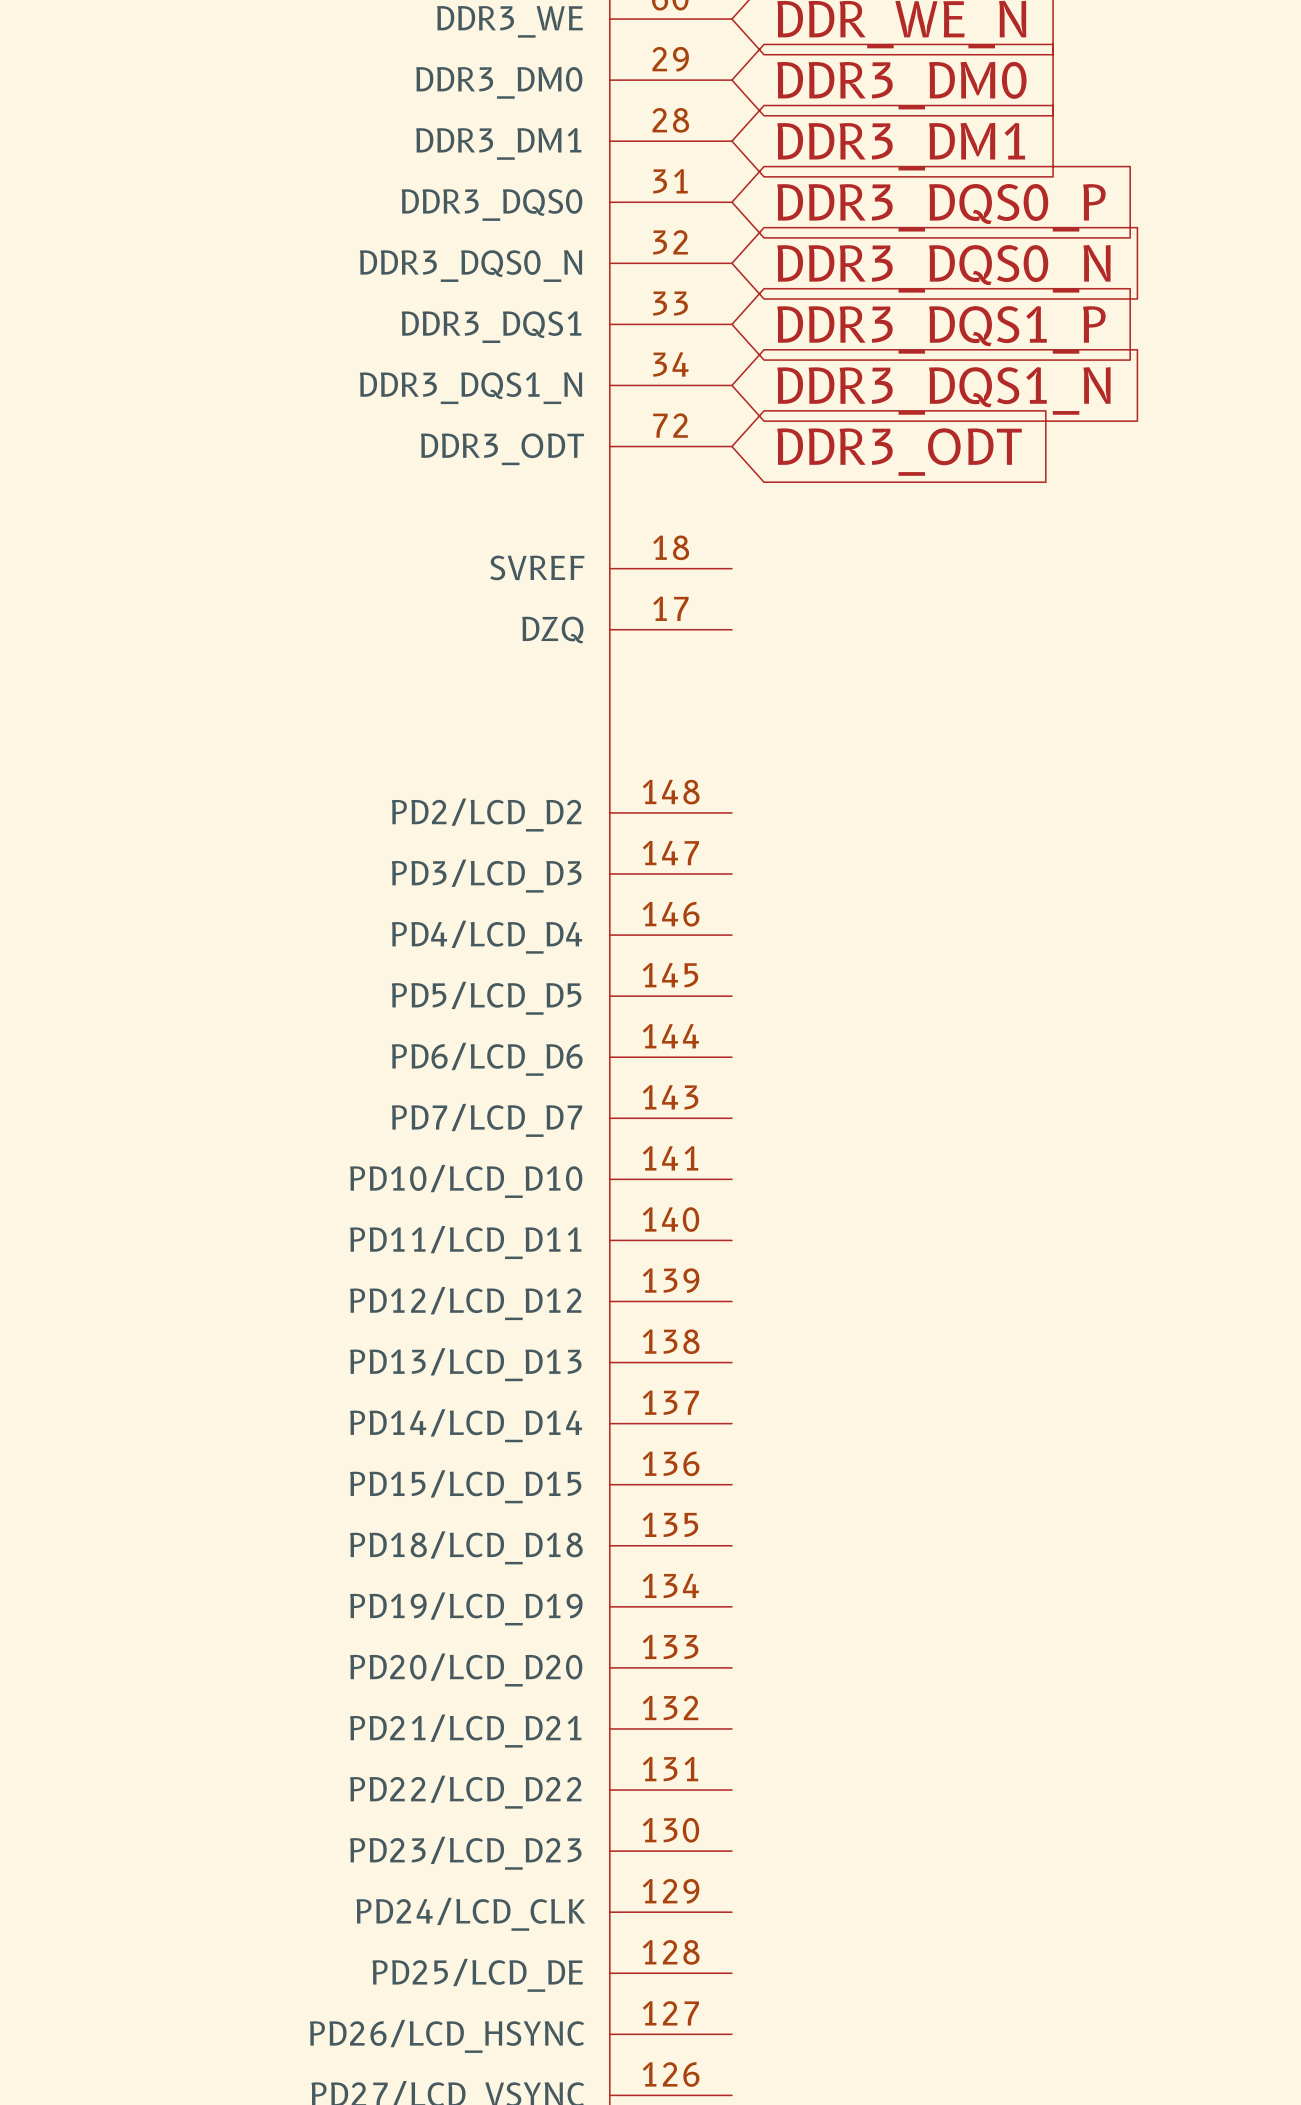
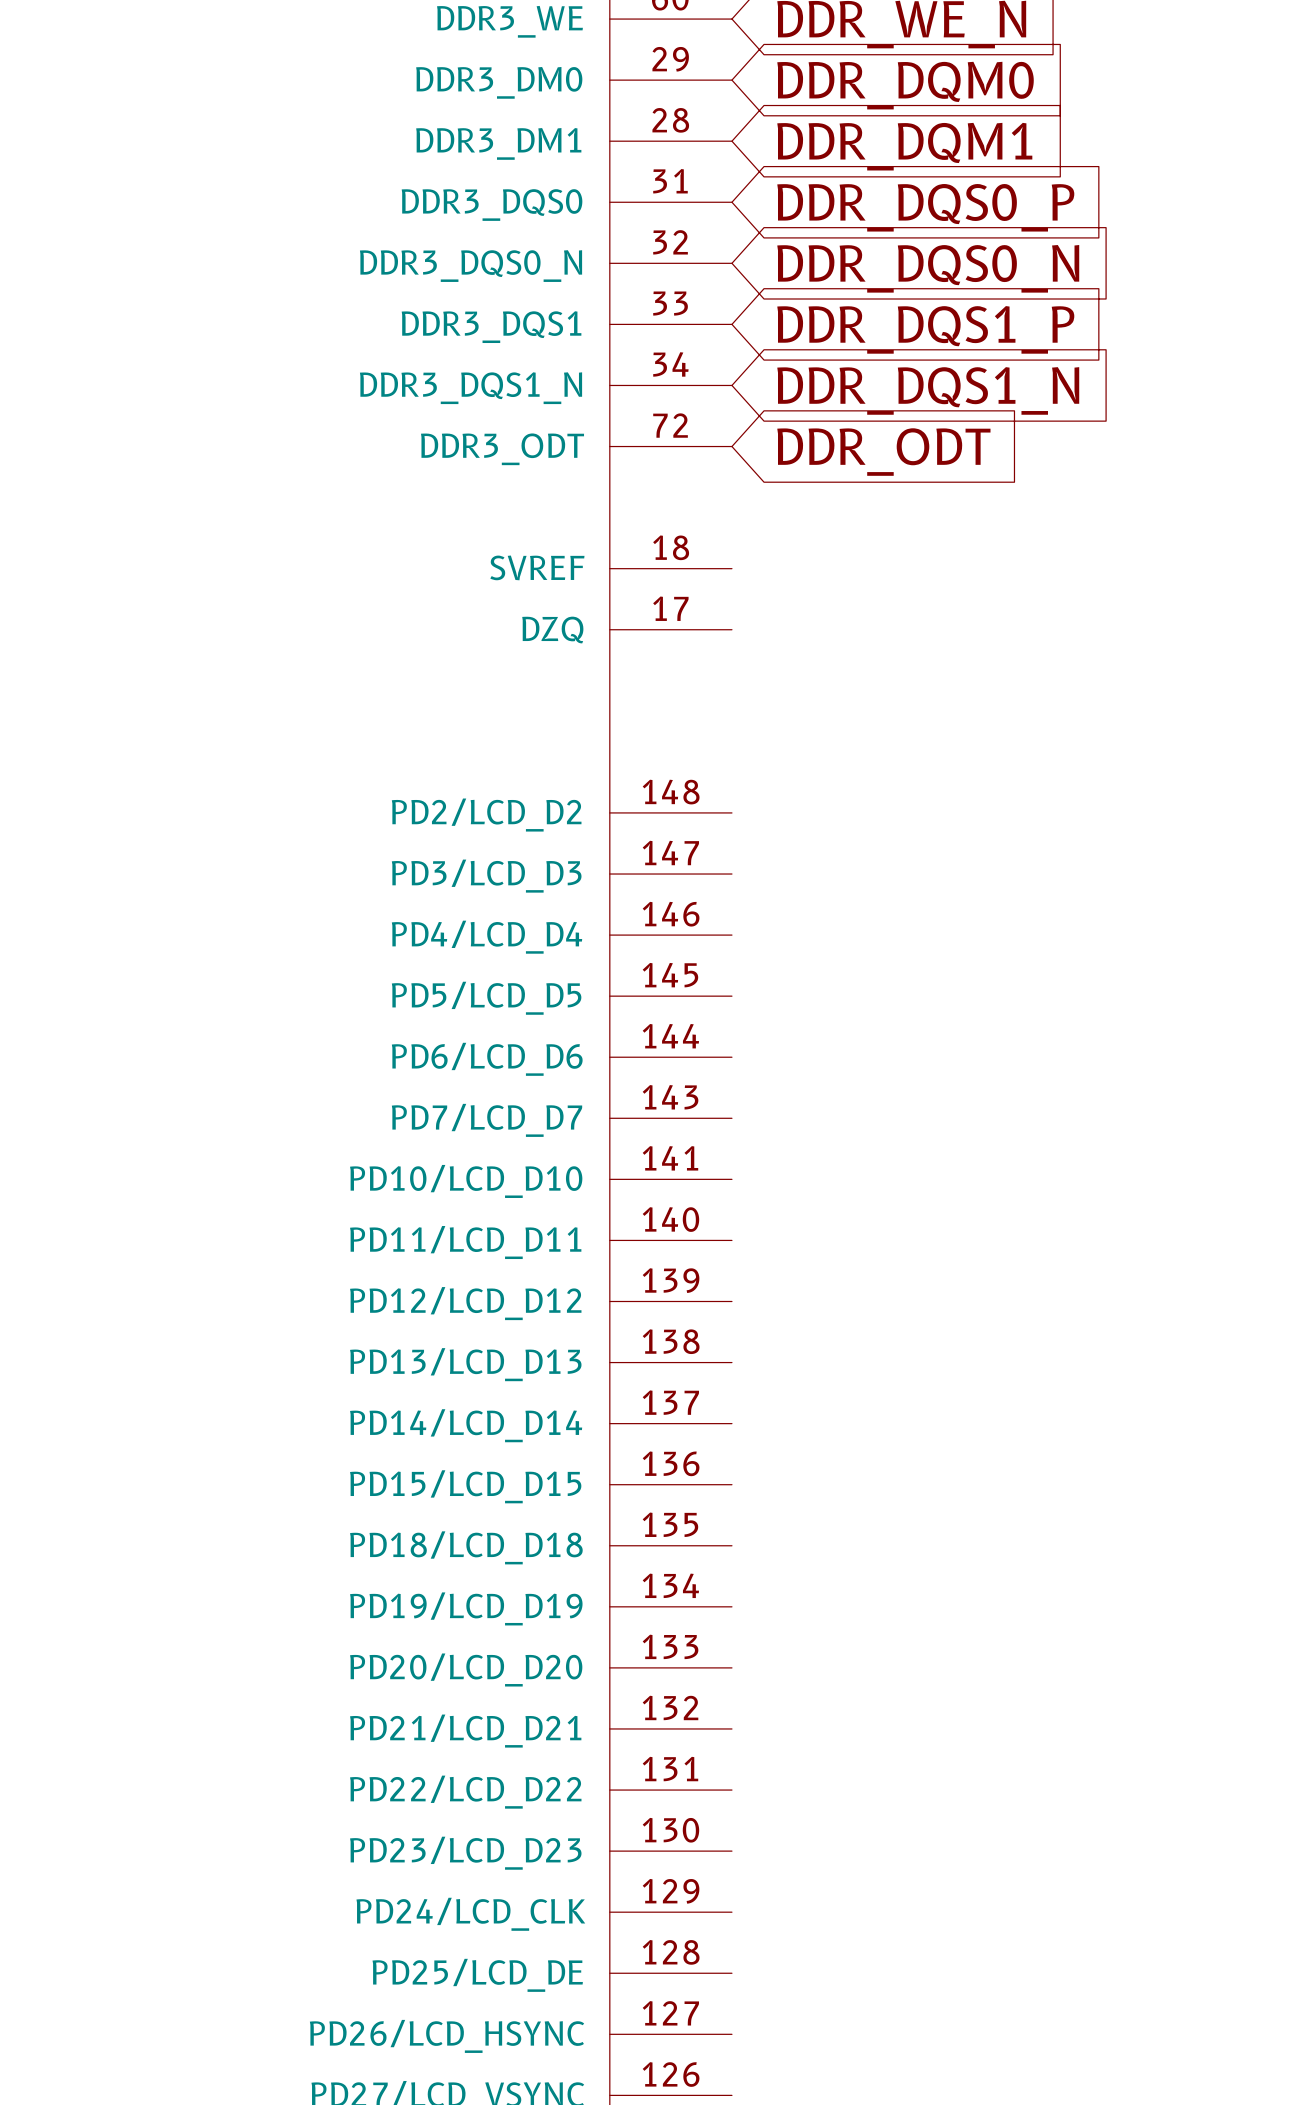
global label: DDR3_DM0 (901, 85) -> DDR_DQM0 (905, 85)
global label: DDR3_DM1 (901, 146) -> DDR_DQM1 (904, 146)
global label: DDR3_DQS0_P (941, 207) -> DDR_DQS0_P (925, 207)
global label: DDR3_DQS0_N (943, 268) -> DDR_DQS0_N (928, 268)
global label: DDR3_DQS1_P (941, 329) -> DDR_DQS1_P (925, 329)
global label: DDR3_DQS1_N (943, 390) -> DDR_DQS1_N (928, 390)
global label: DDR3_ODT (899, 452) -> DDR_ODT (883, 452)

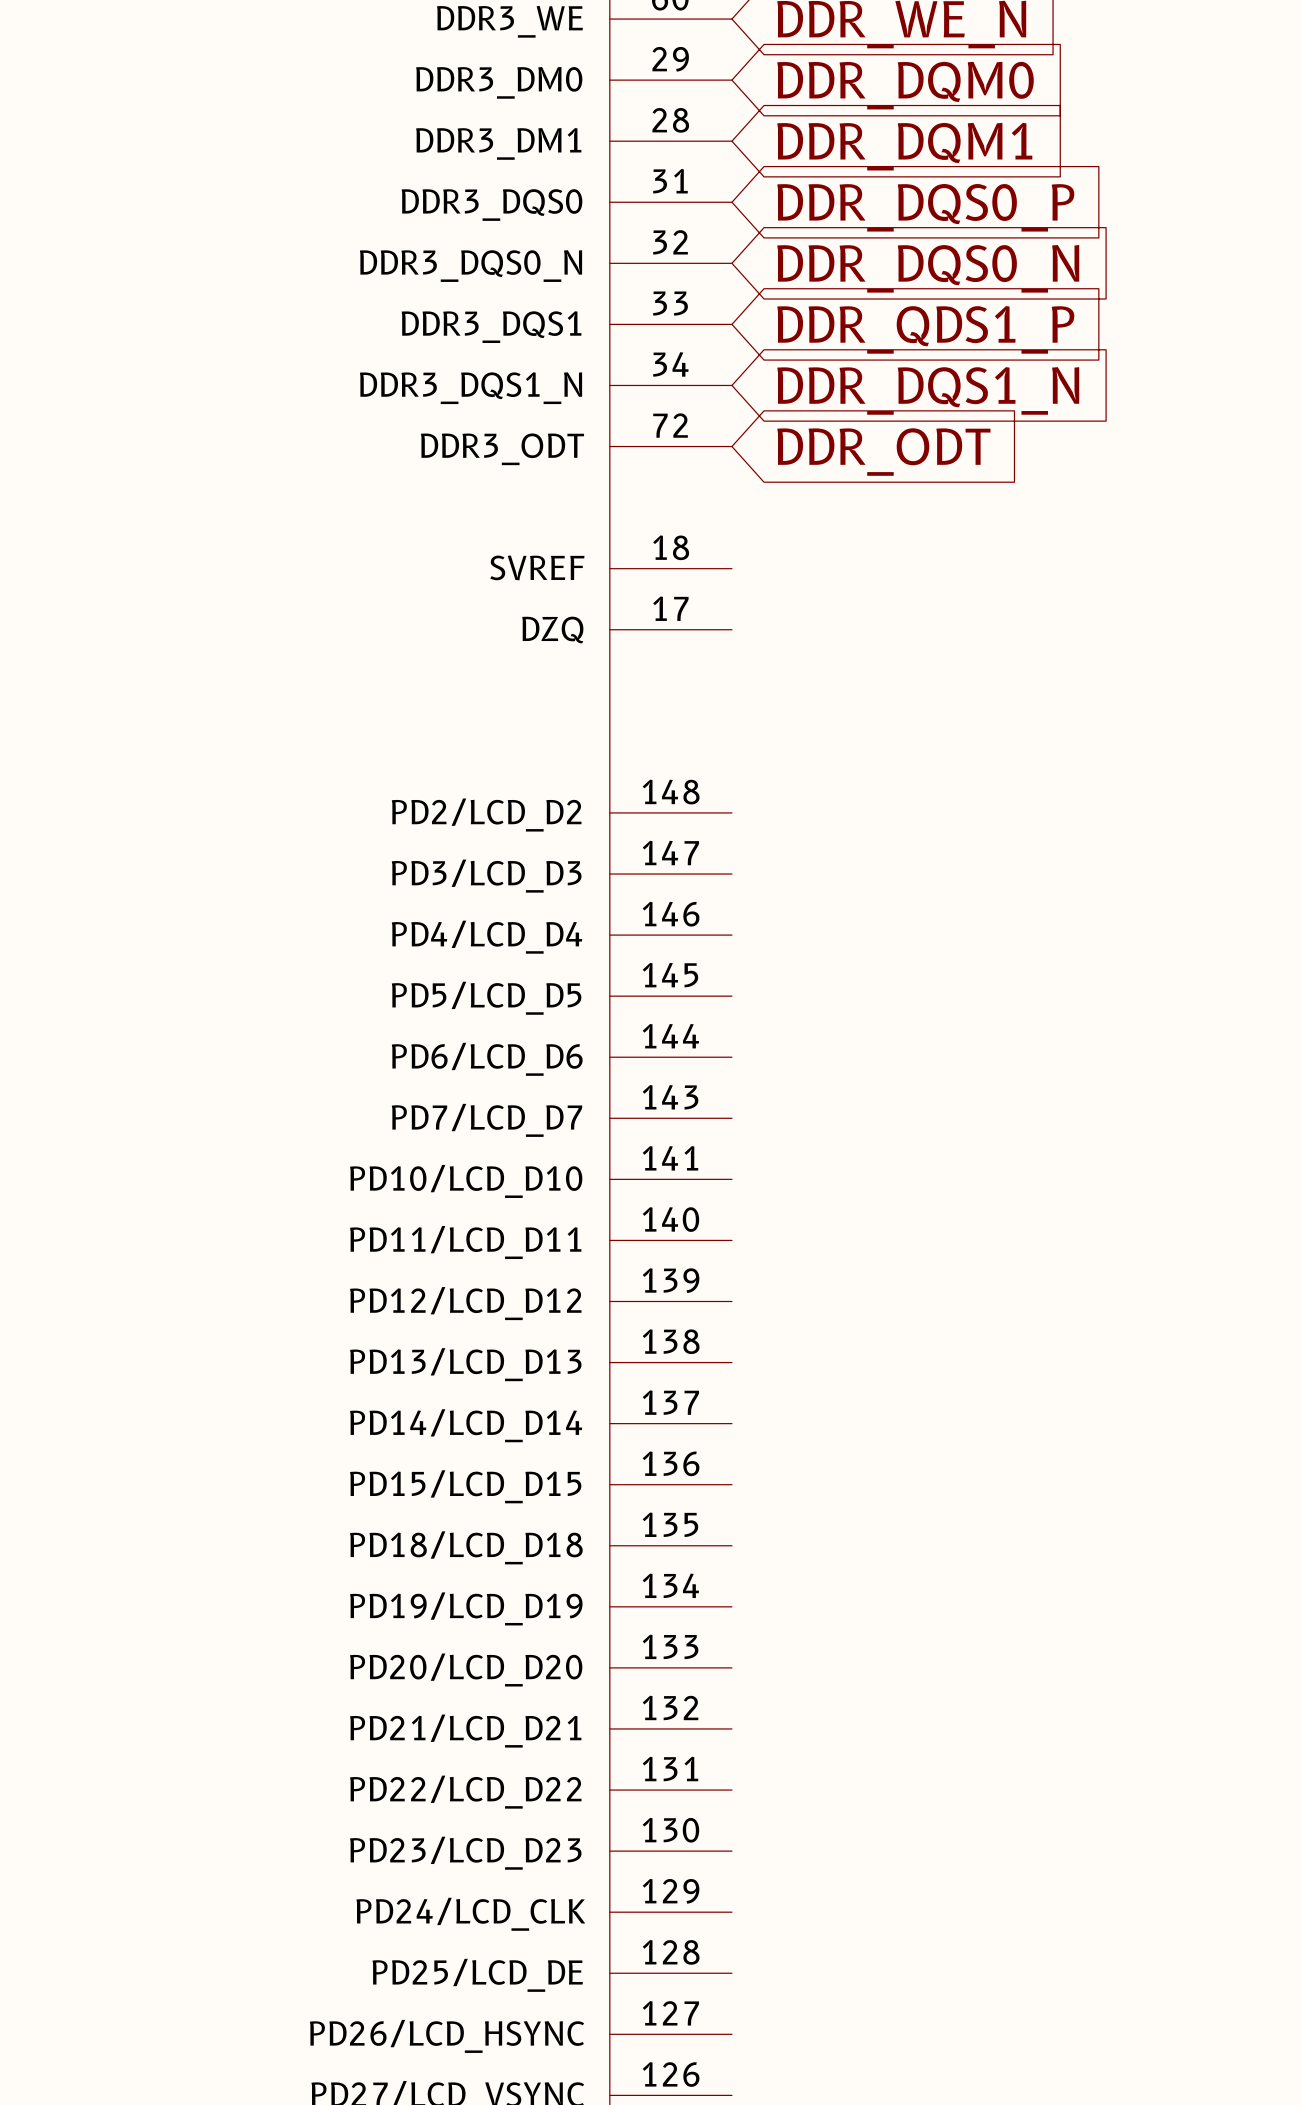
global label: DDR_DQS1_P (925, 329) -> DDR_QDS1_P (925, 329)

